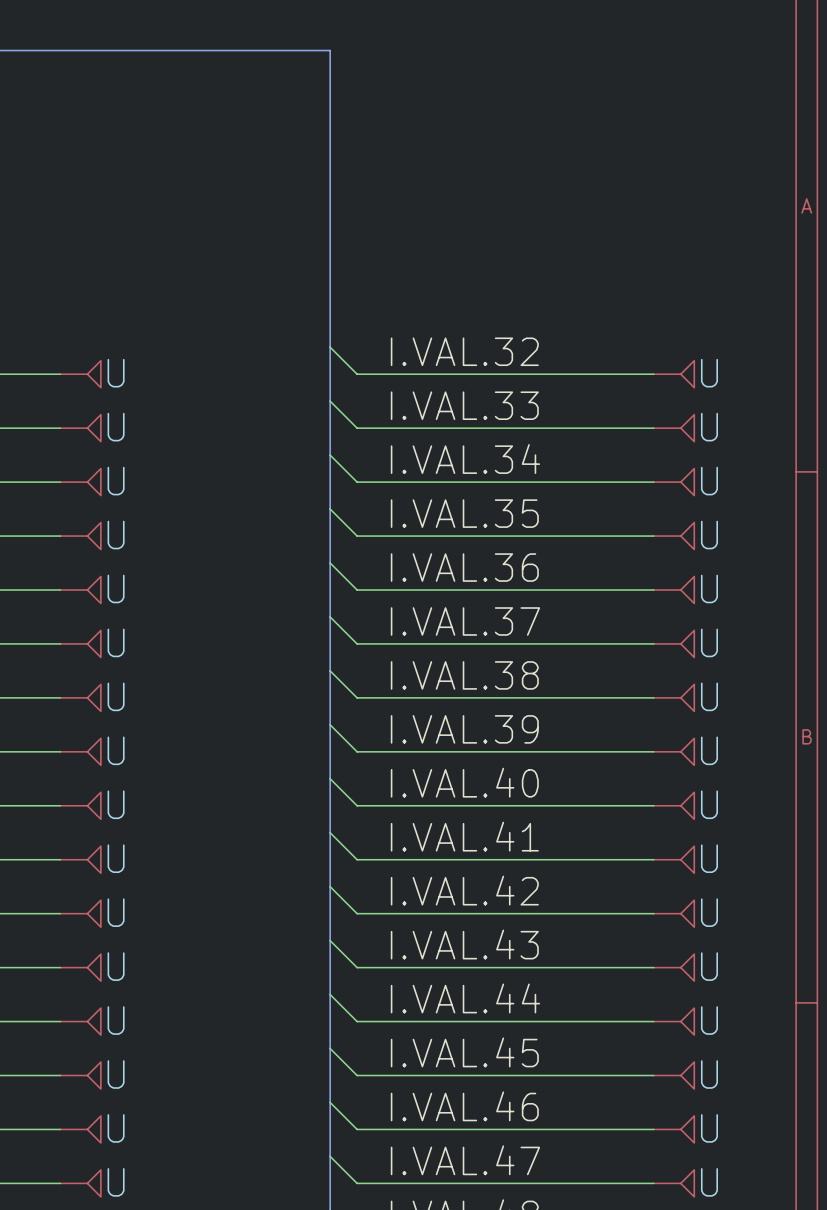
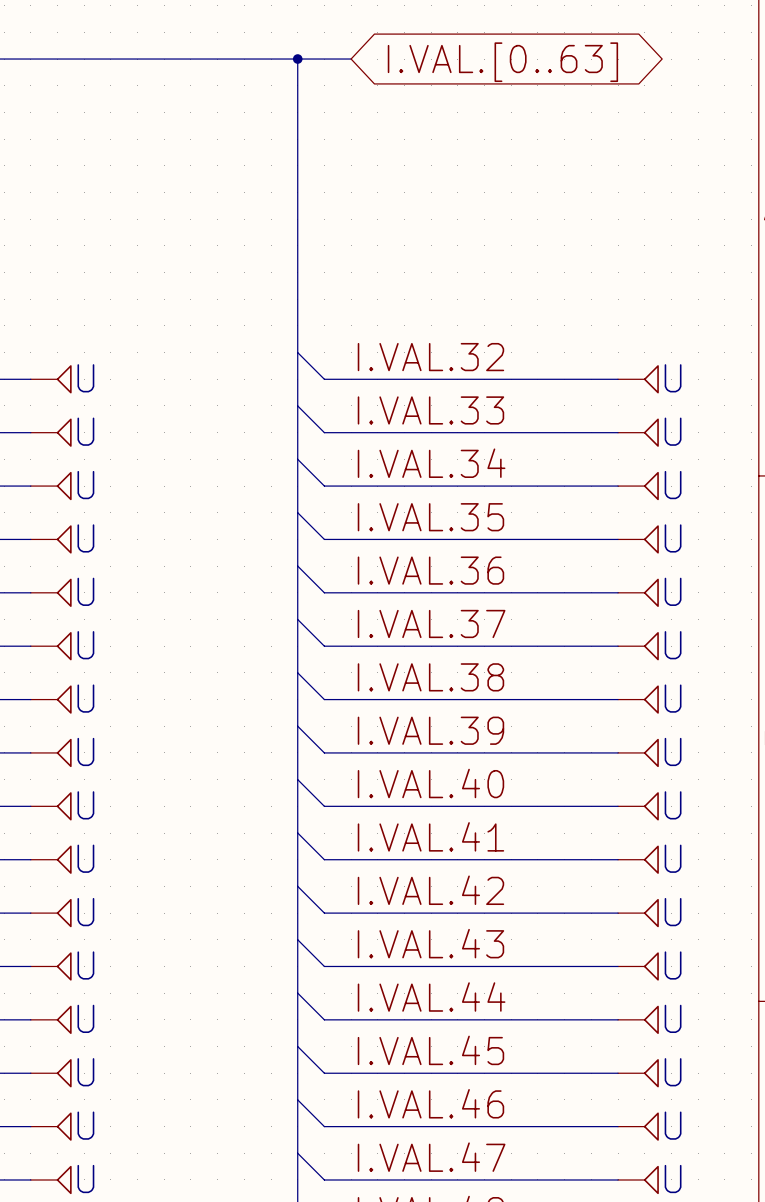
bus: none -> (297, 59) (351, 59)
junction: none -> (297, 59)
global label: none -> I.VAL.[0..63] (502, 62)

